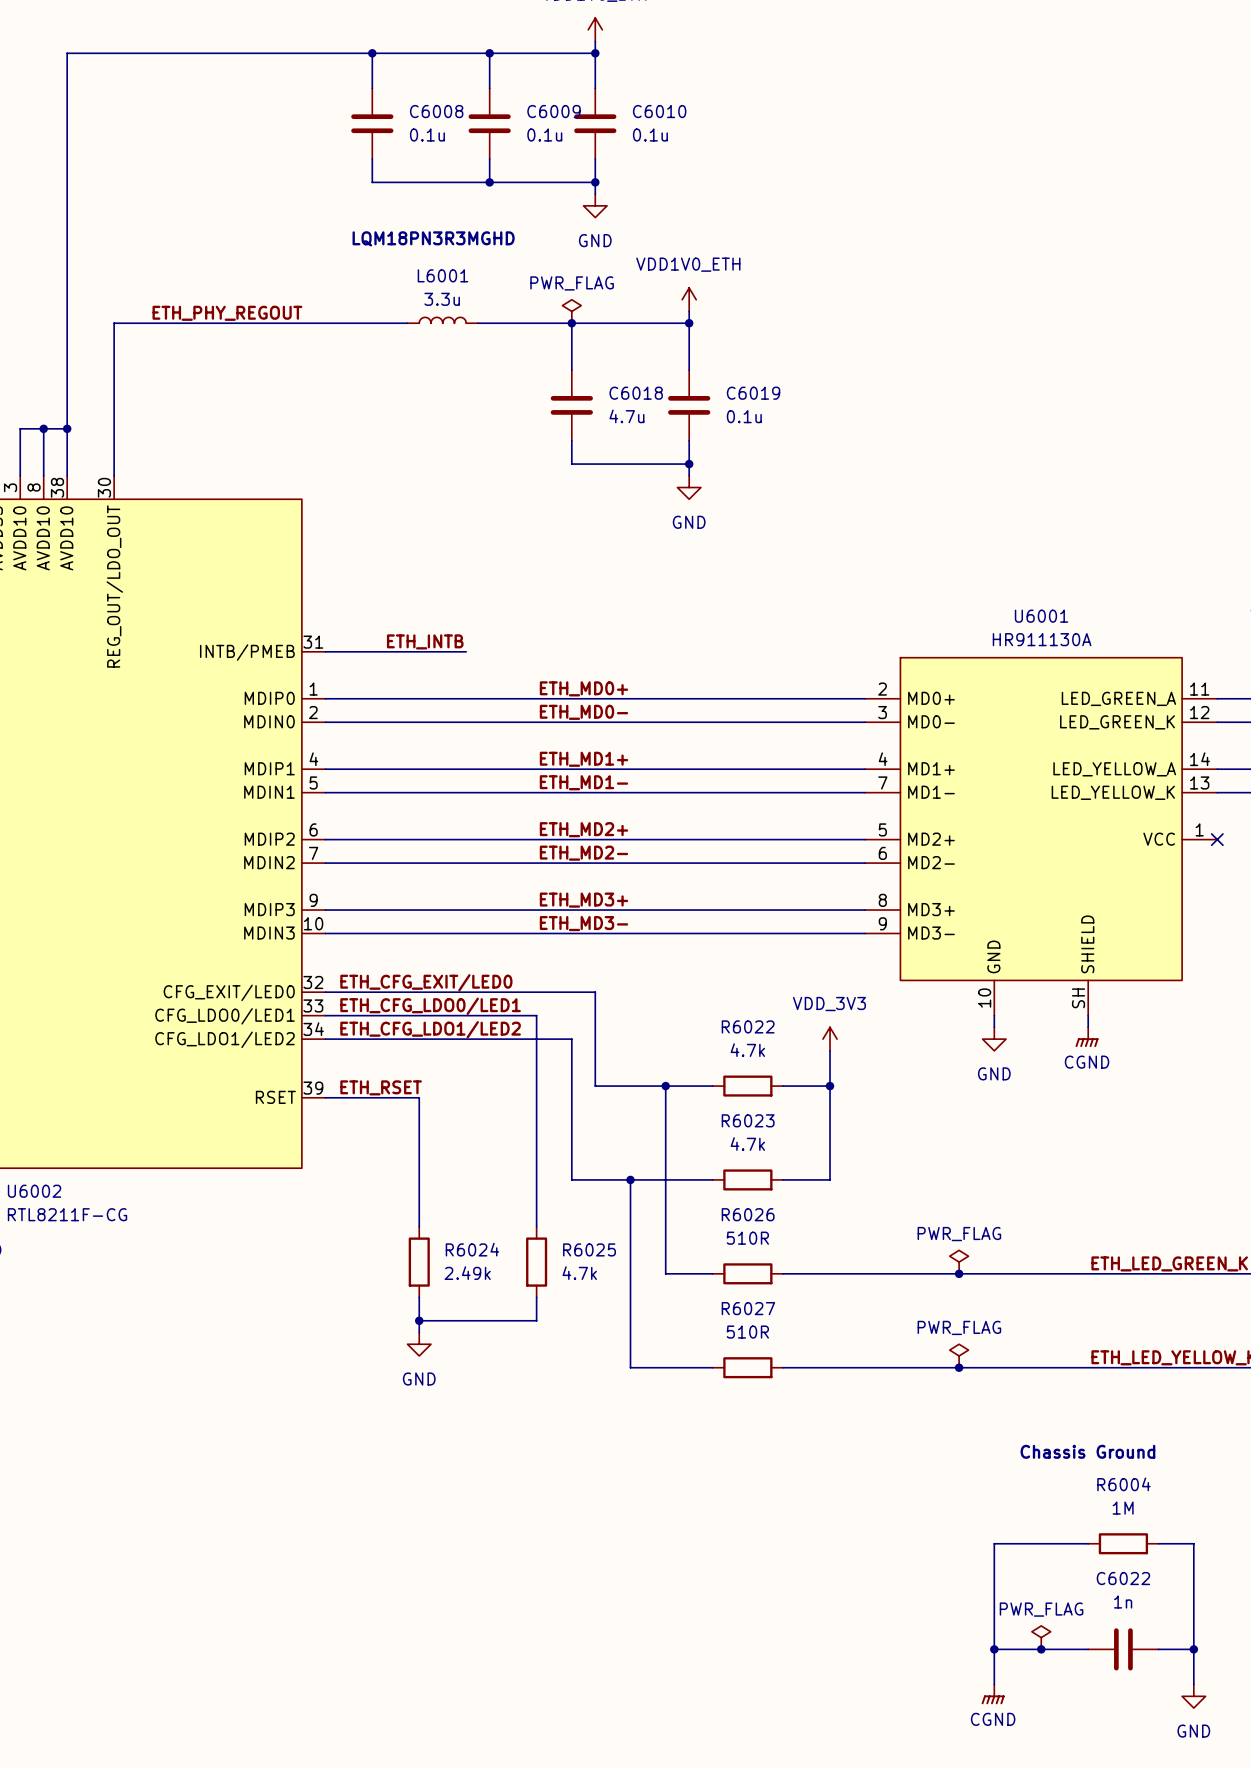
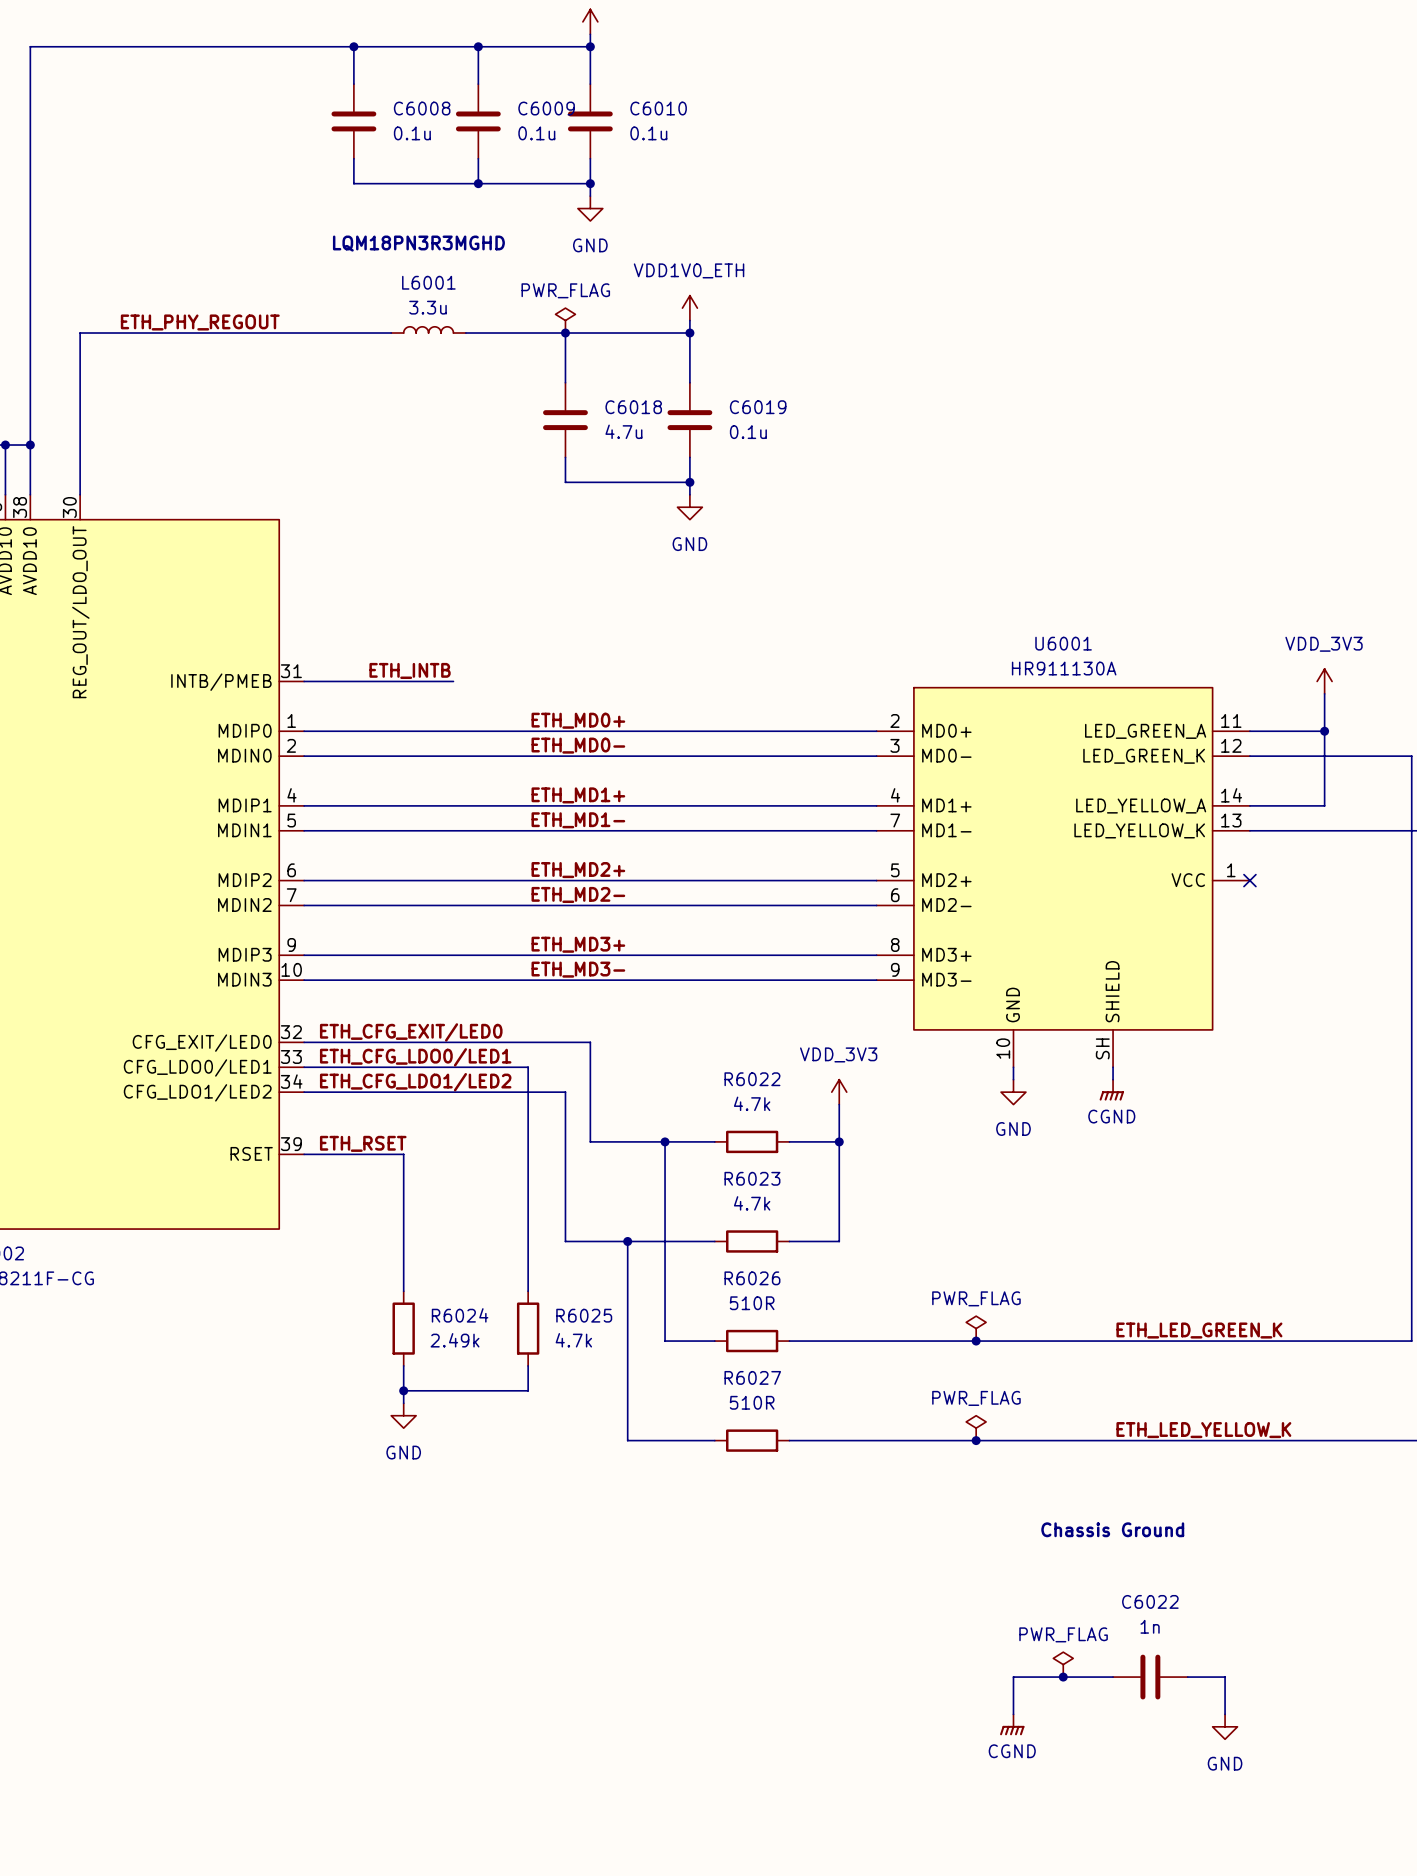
wire: (1088, 1543) (994, 1543) (994, 1590) -> (1113, 1677) (1013, 1677)
R6004: 1M (1123, 1543) -> none
wire: (1158, 1543) (1193, 1543) (1193, 1590) -> (1187, 1677) (1225, 1677)
junction: none -> (1063, 1677)
wire: (994, 1625) (994, 1684) -> none
wire: (1193, 1625) (1193, 1684) -> none
power symbol position: PWR_FLAG (1041, 1637) -> PWR_FLAG (1063, 1664)
wire: (994, 1649) (1088, 1649) -> none
junction: (994, 1649) -> none
junction: (1041, 1649) -> none
C6022 position: (1123, 1649) -> (1150, 1677)
wire: (1158, 1649) (1193, 1649) -> none
junction: (1193, 1649) -> none
power symbol position: CGND (993, 1694) -> CGND (1012, 1724)
power symbol position: GND (1193, 1696) -> GND (1225, 1726)

